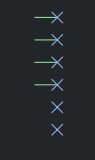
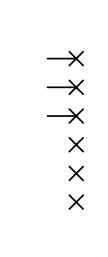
wire: (34, 84) (57, 84) -> none

